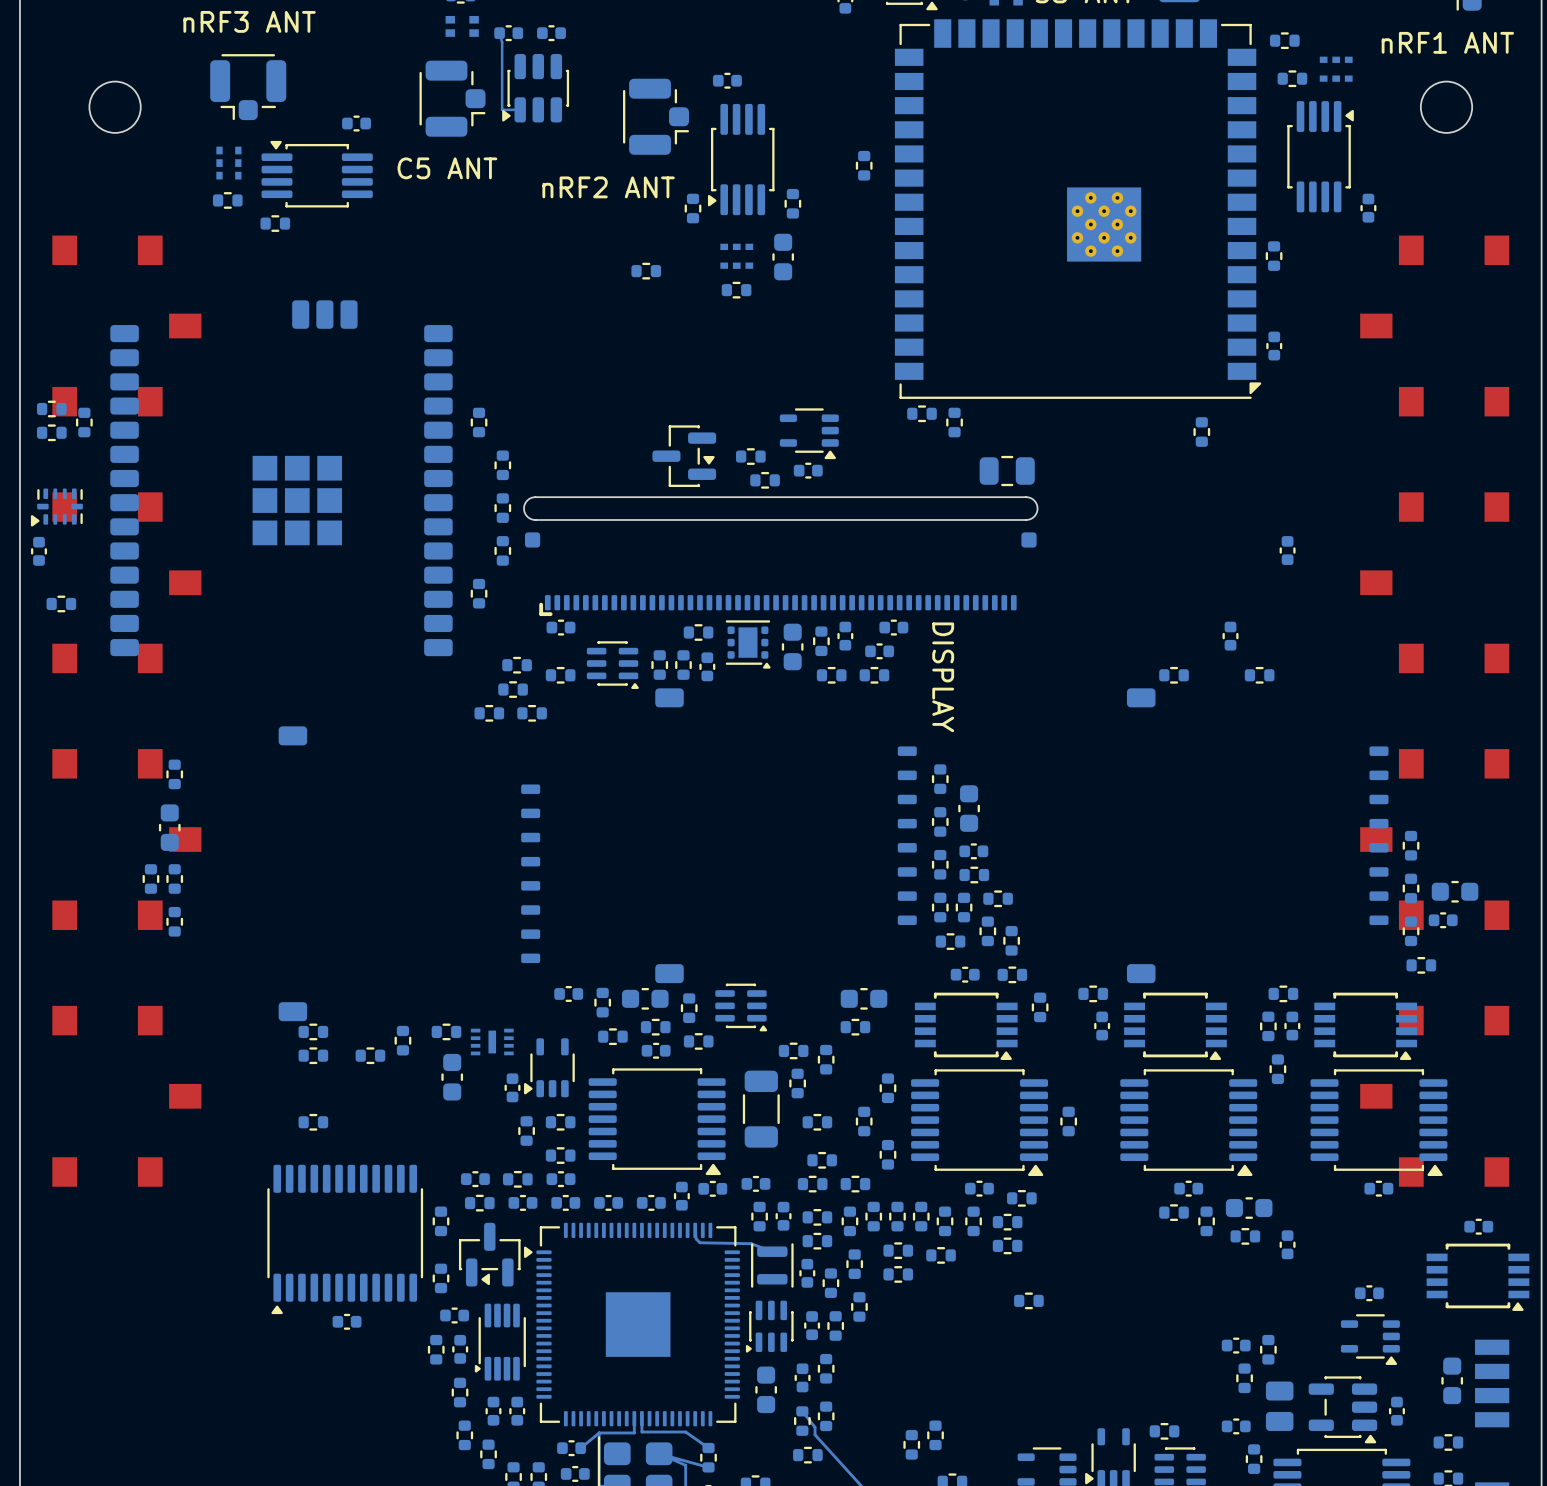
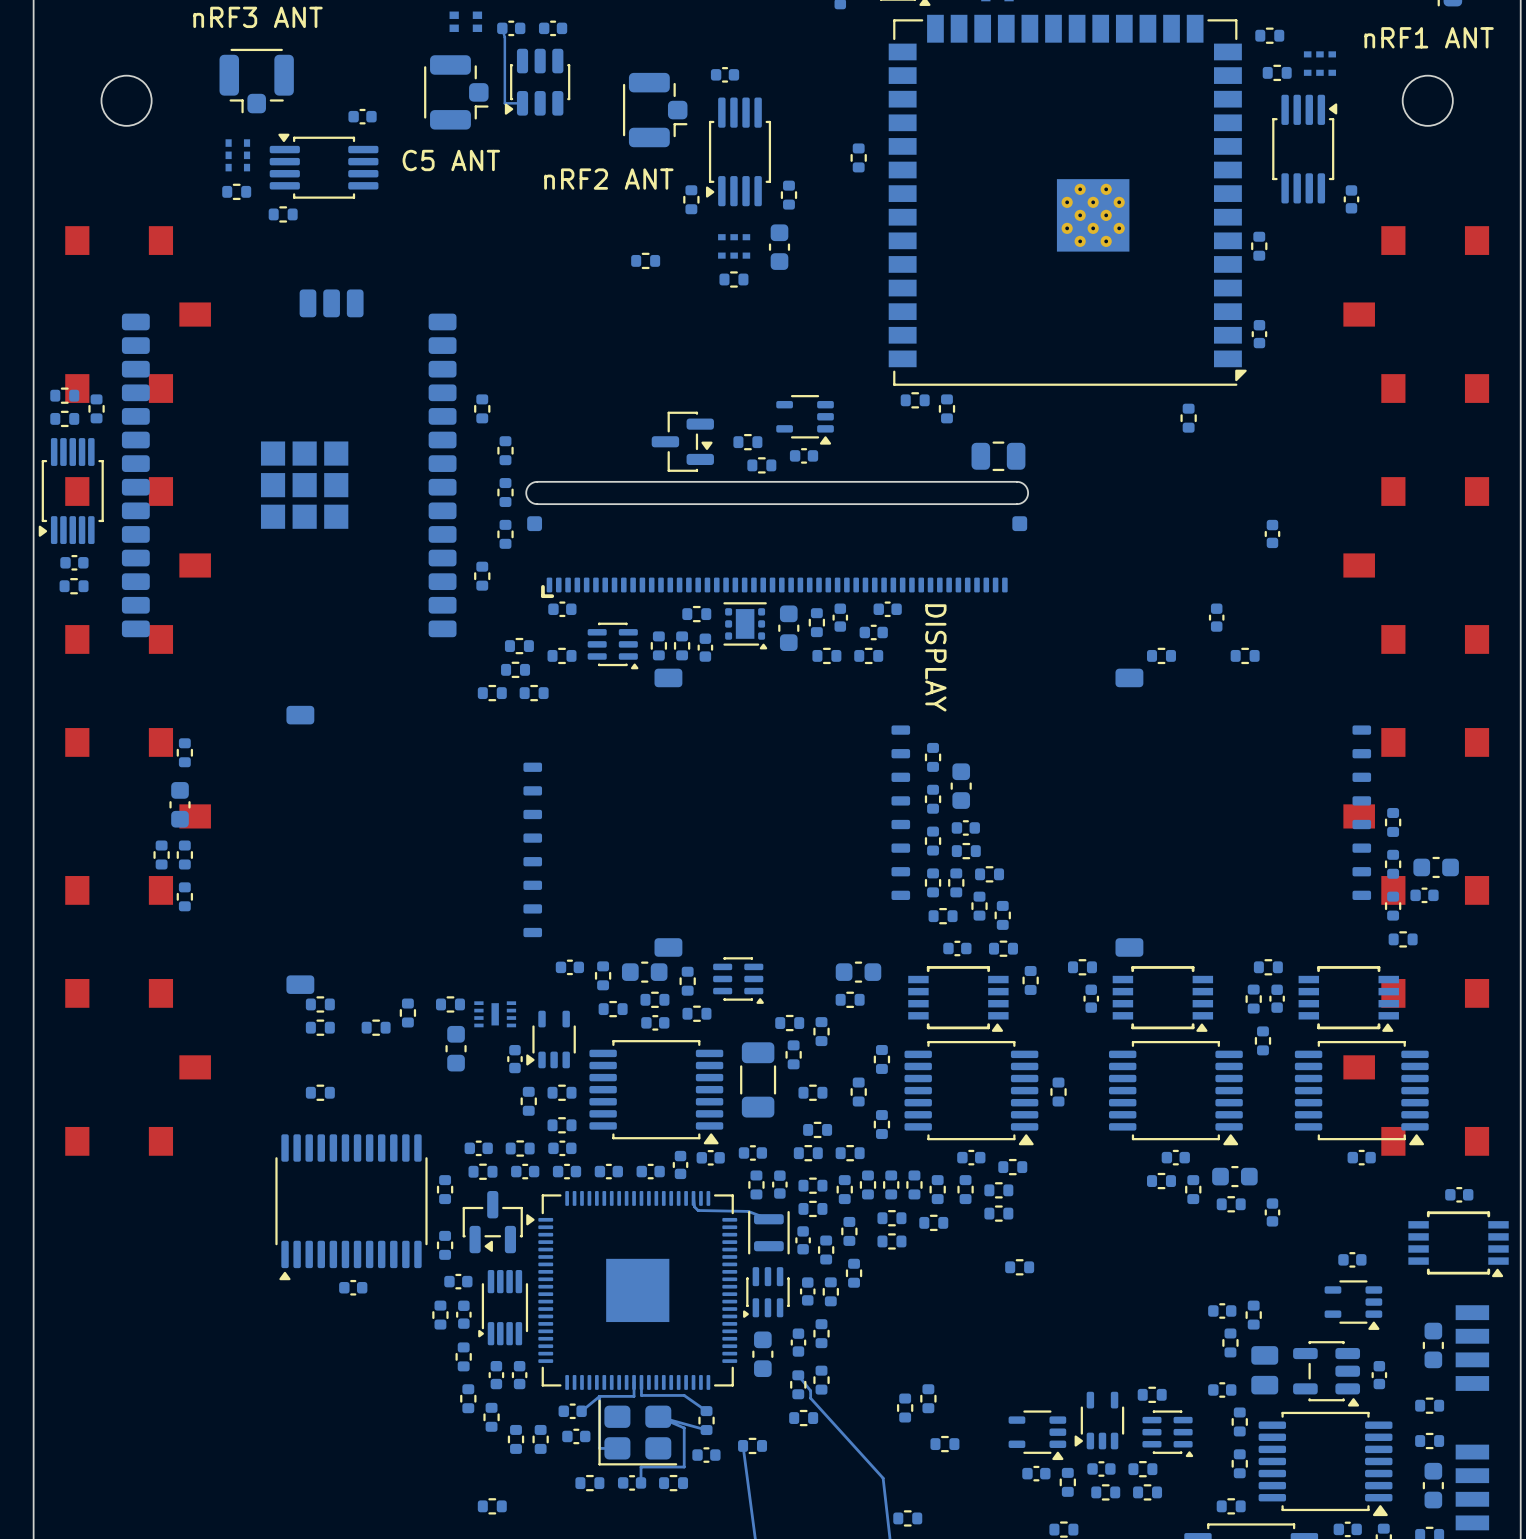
part footprint: [30, 488, 83, 527] -> [38, 438, 104, 545]
part rotation: 0° (39, 551) -> 90° clockwise (74, 562)
part position: (39, 551) -> (74, 562)

